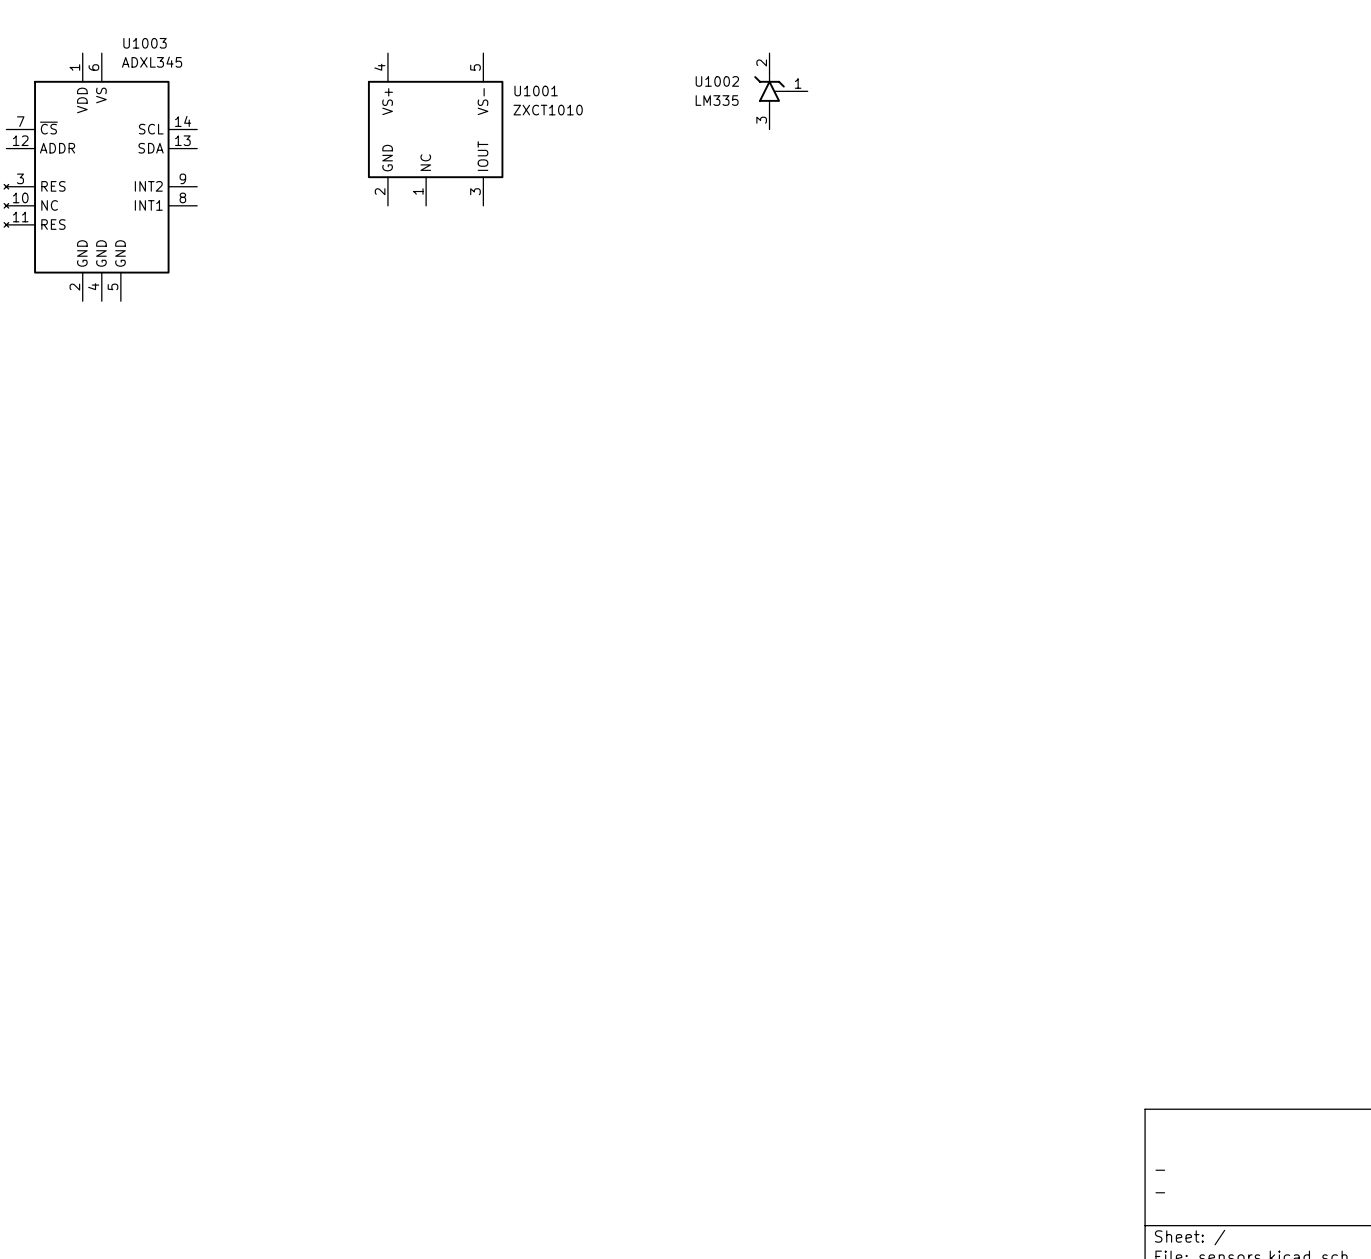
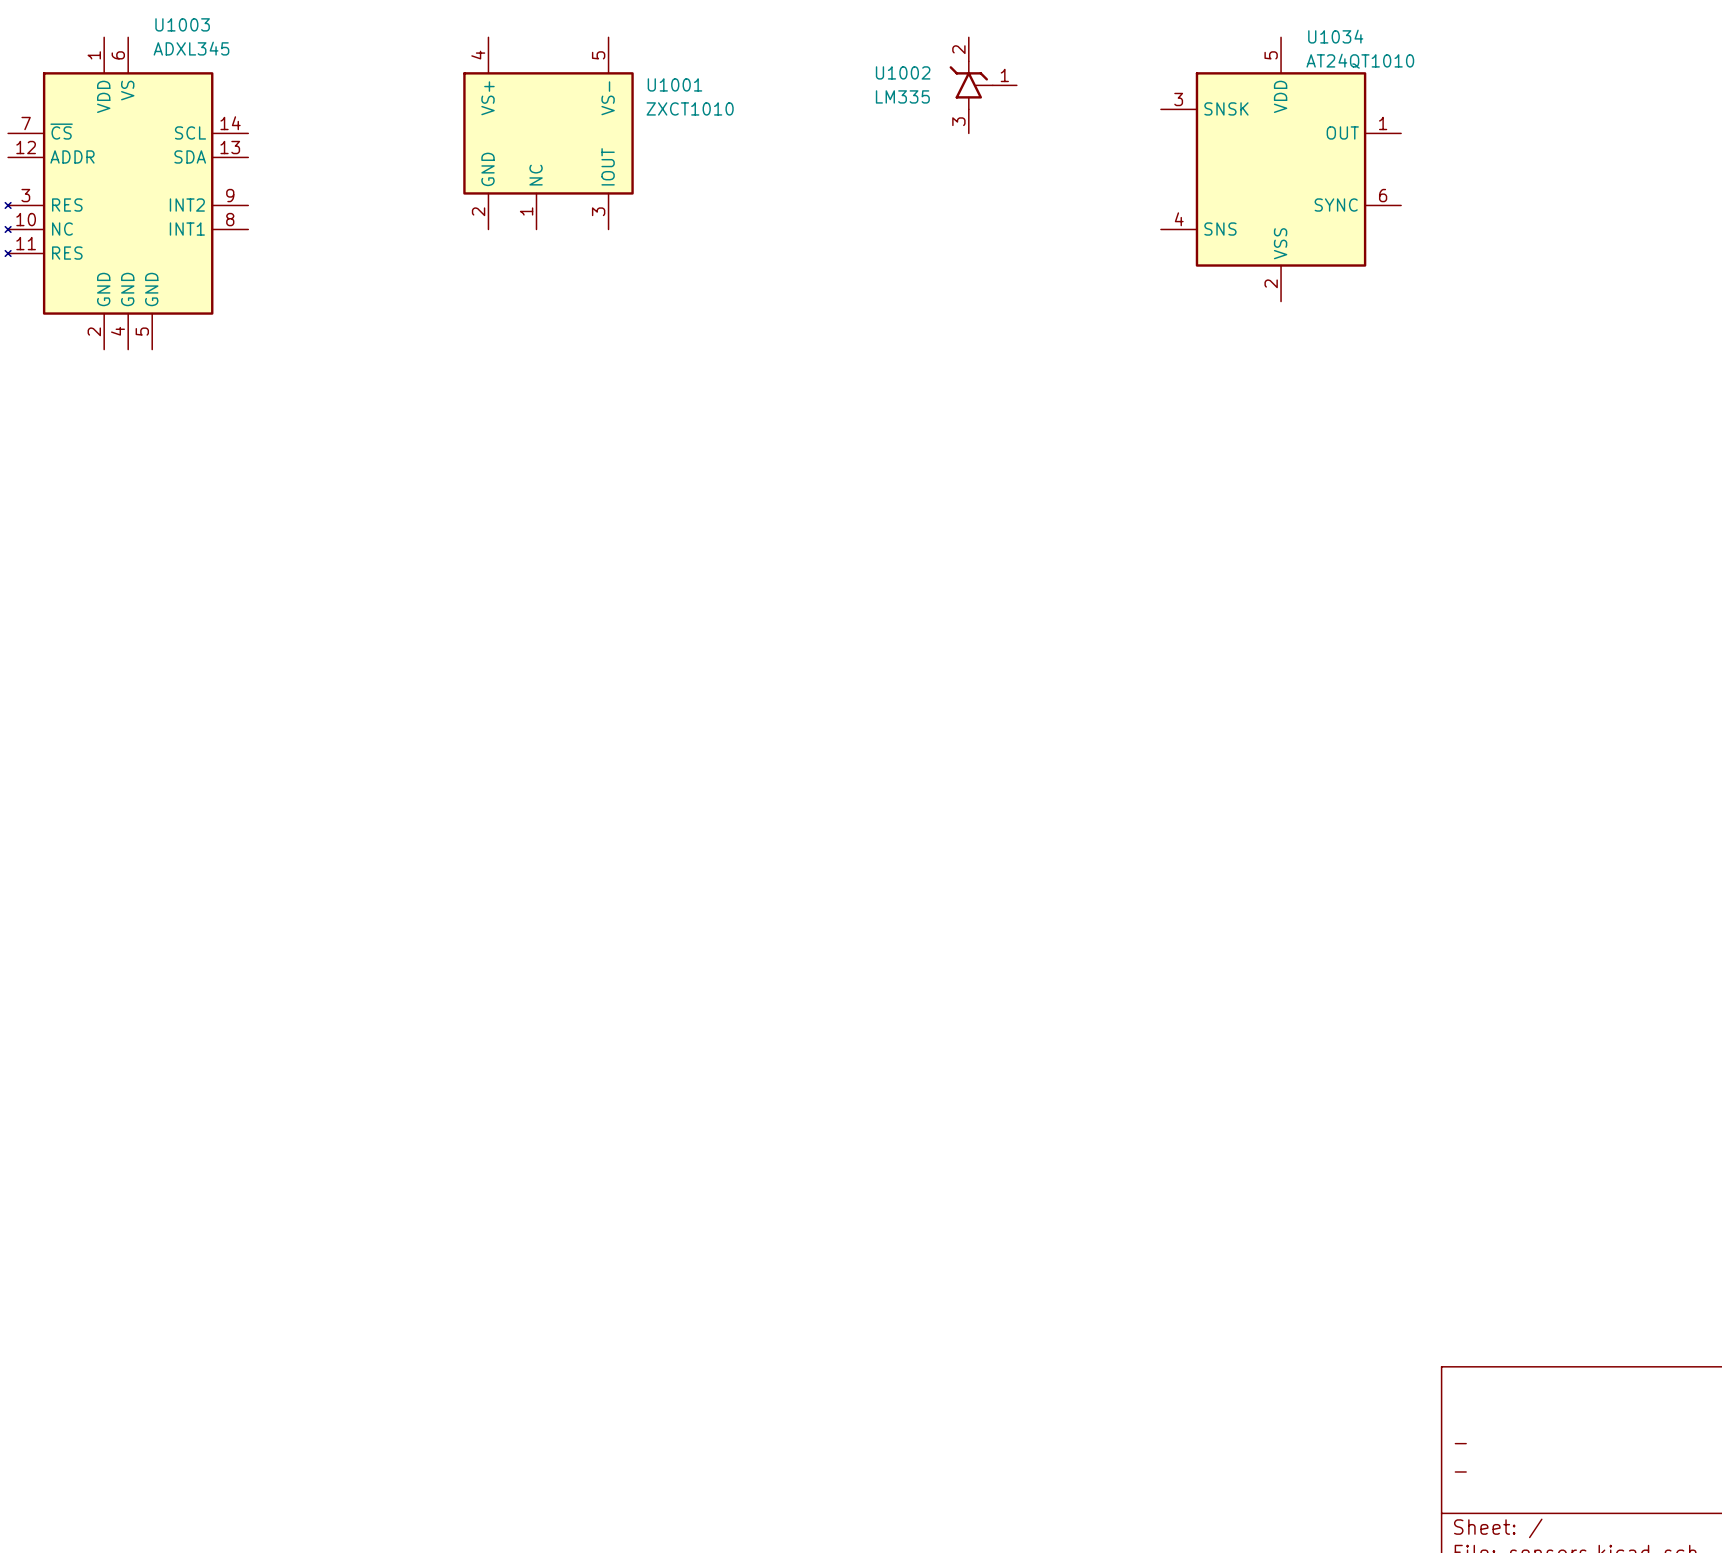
U1034: none -> AT24QT1010 (1281, 169)

